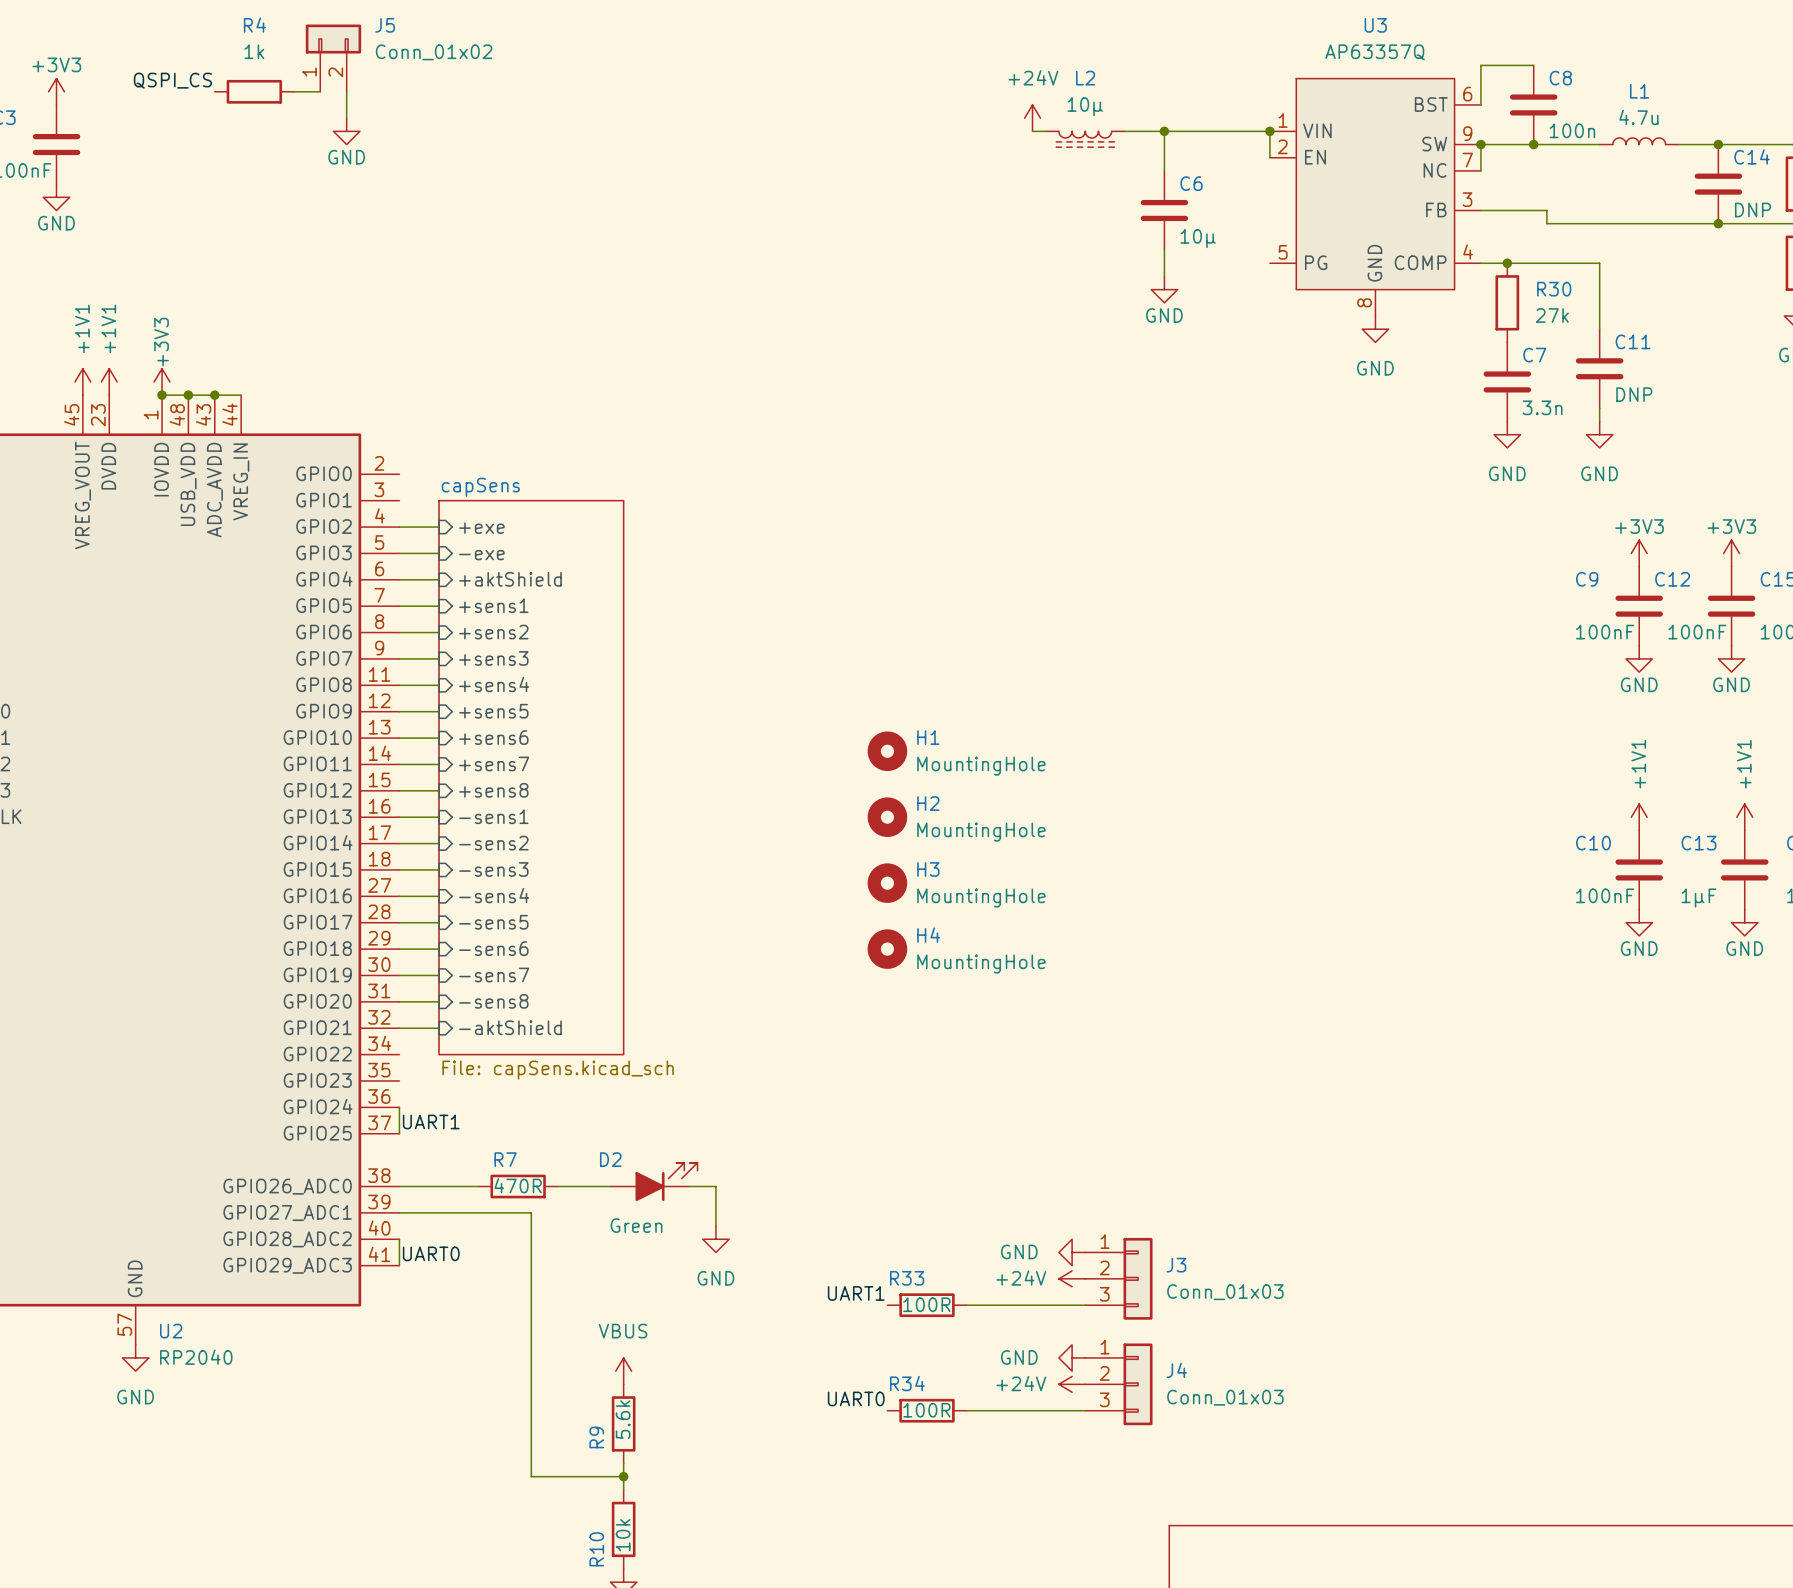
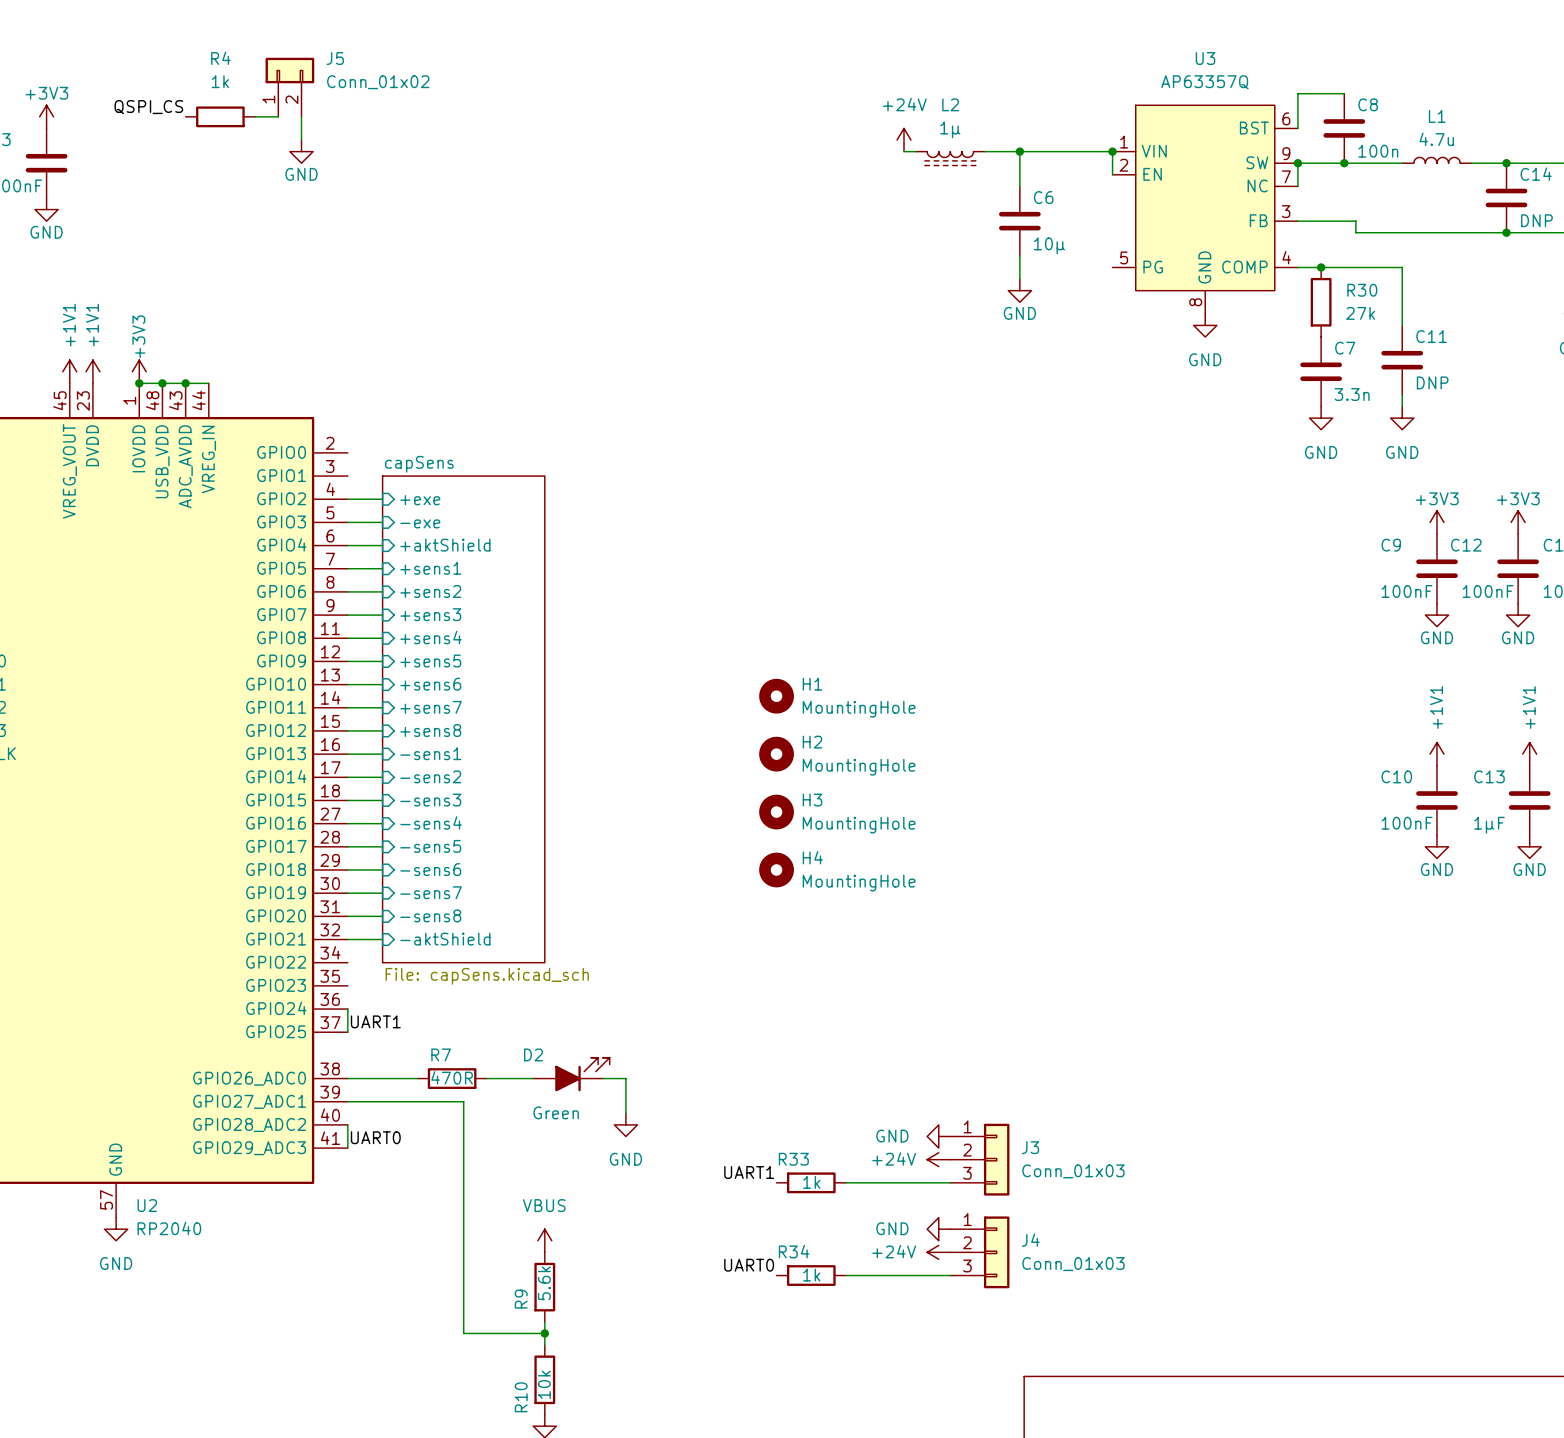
L2 value: 10µ (1085, 106) -> 1µ (950, 129)
R33 value: 100R (926, 1304) -> 1k (811, 1182)
R34 value: 100R (926, 1410) -> 1k (811, 1275)

